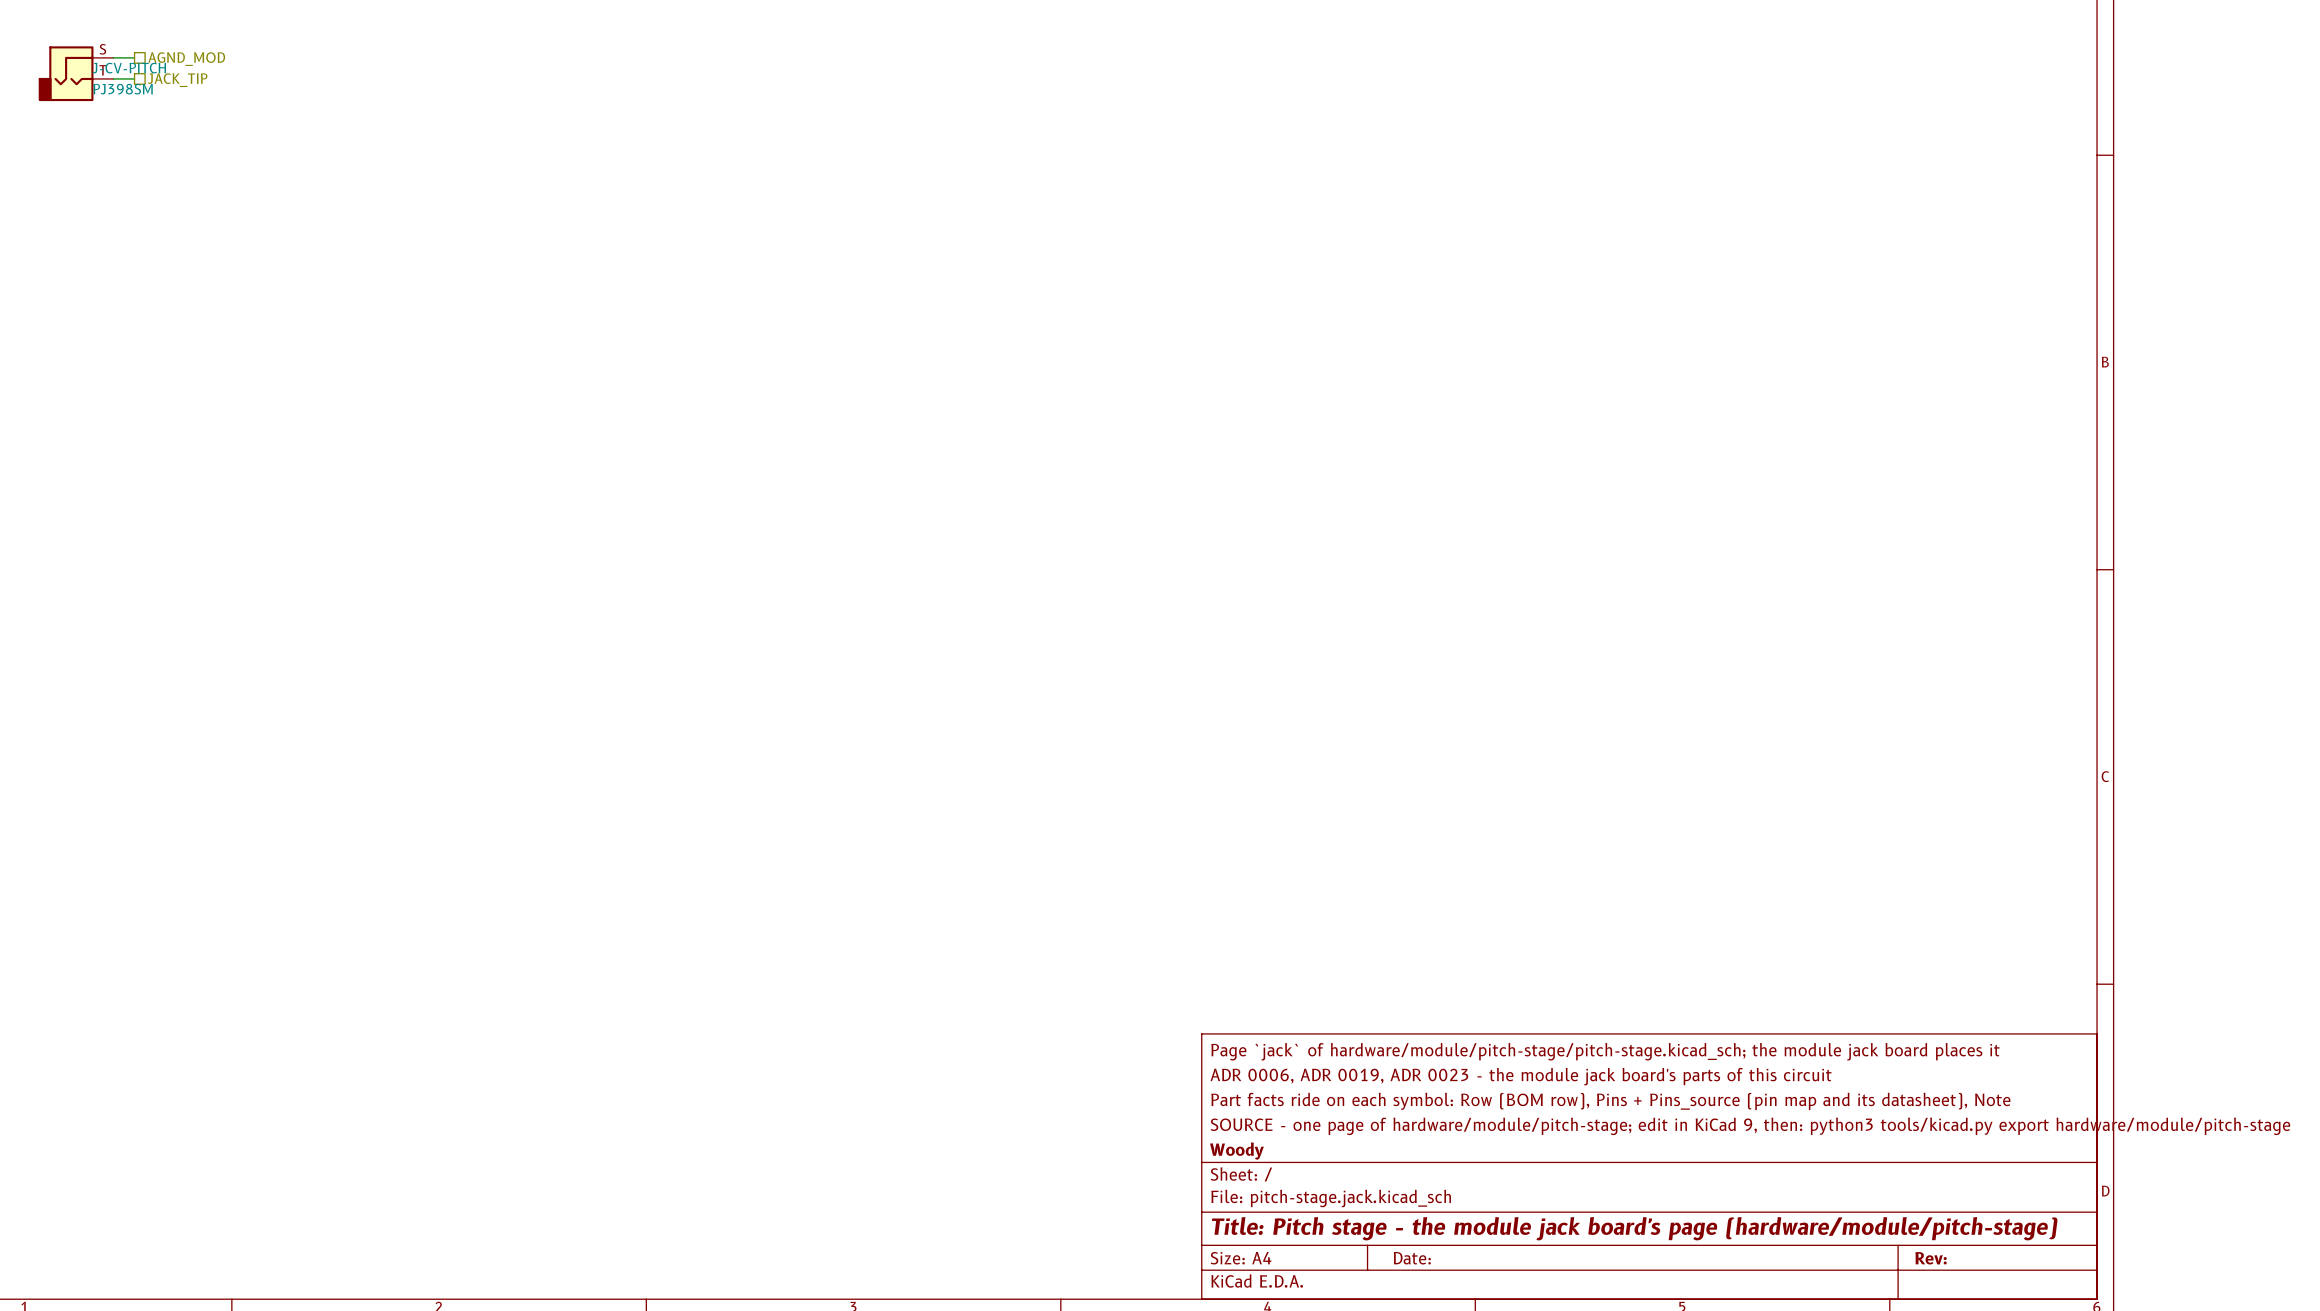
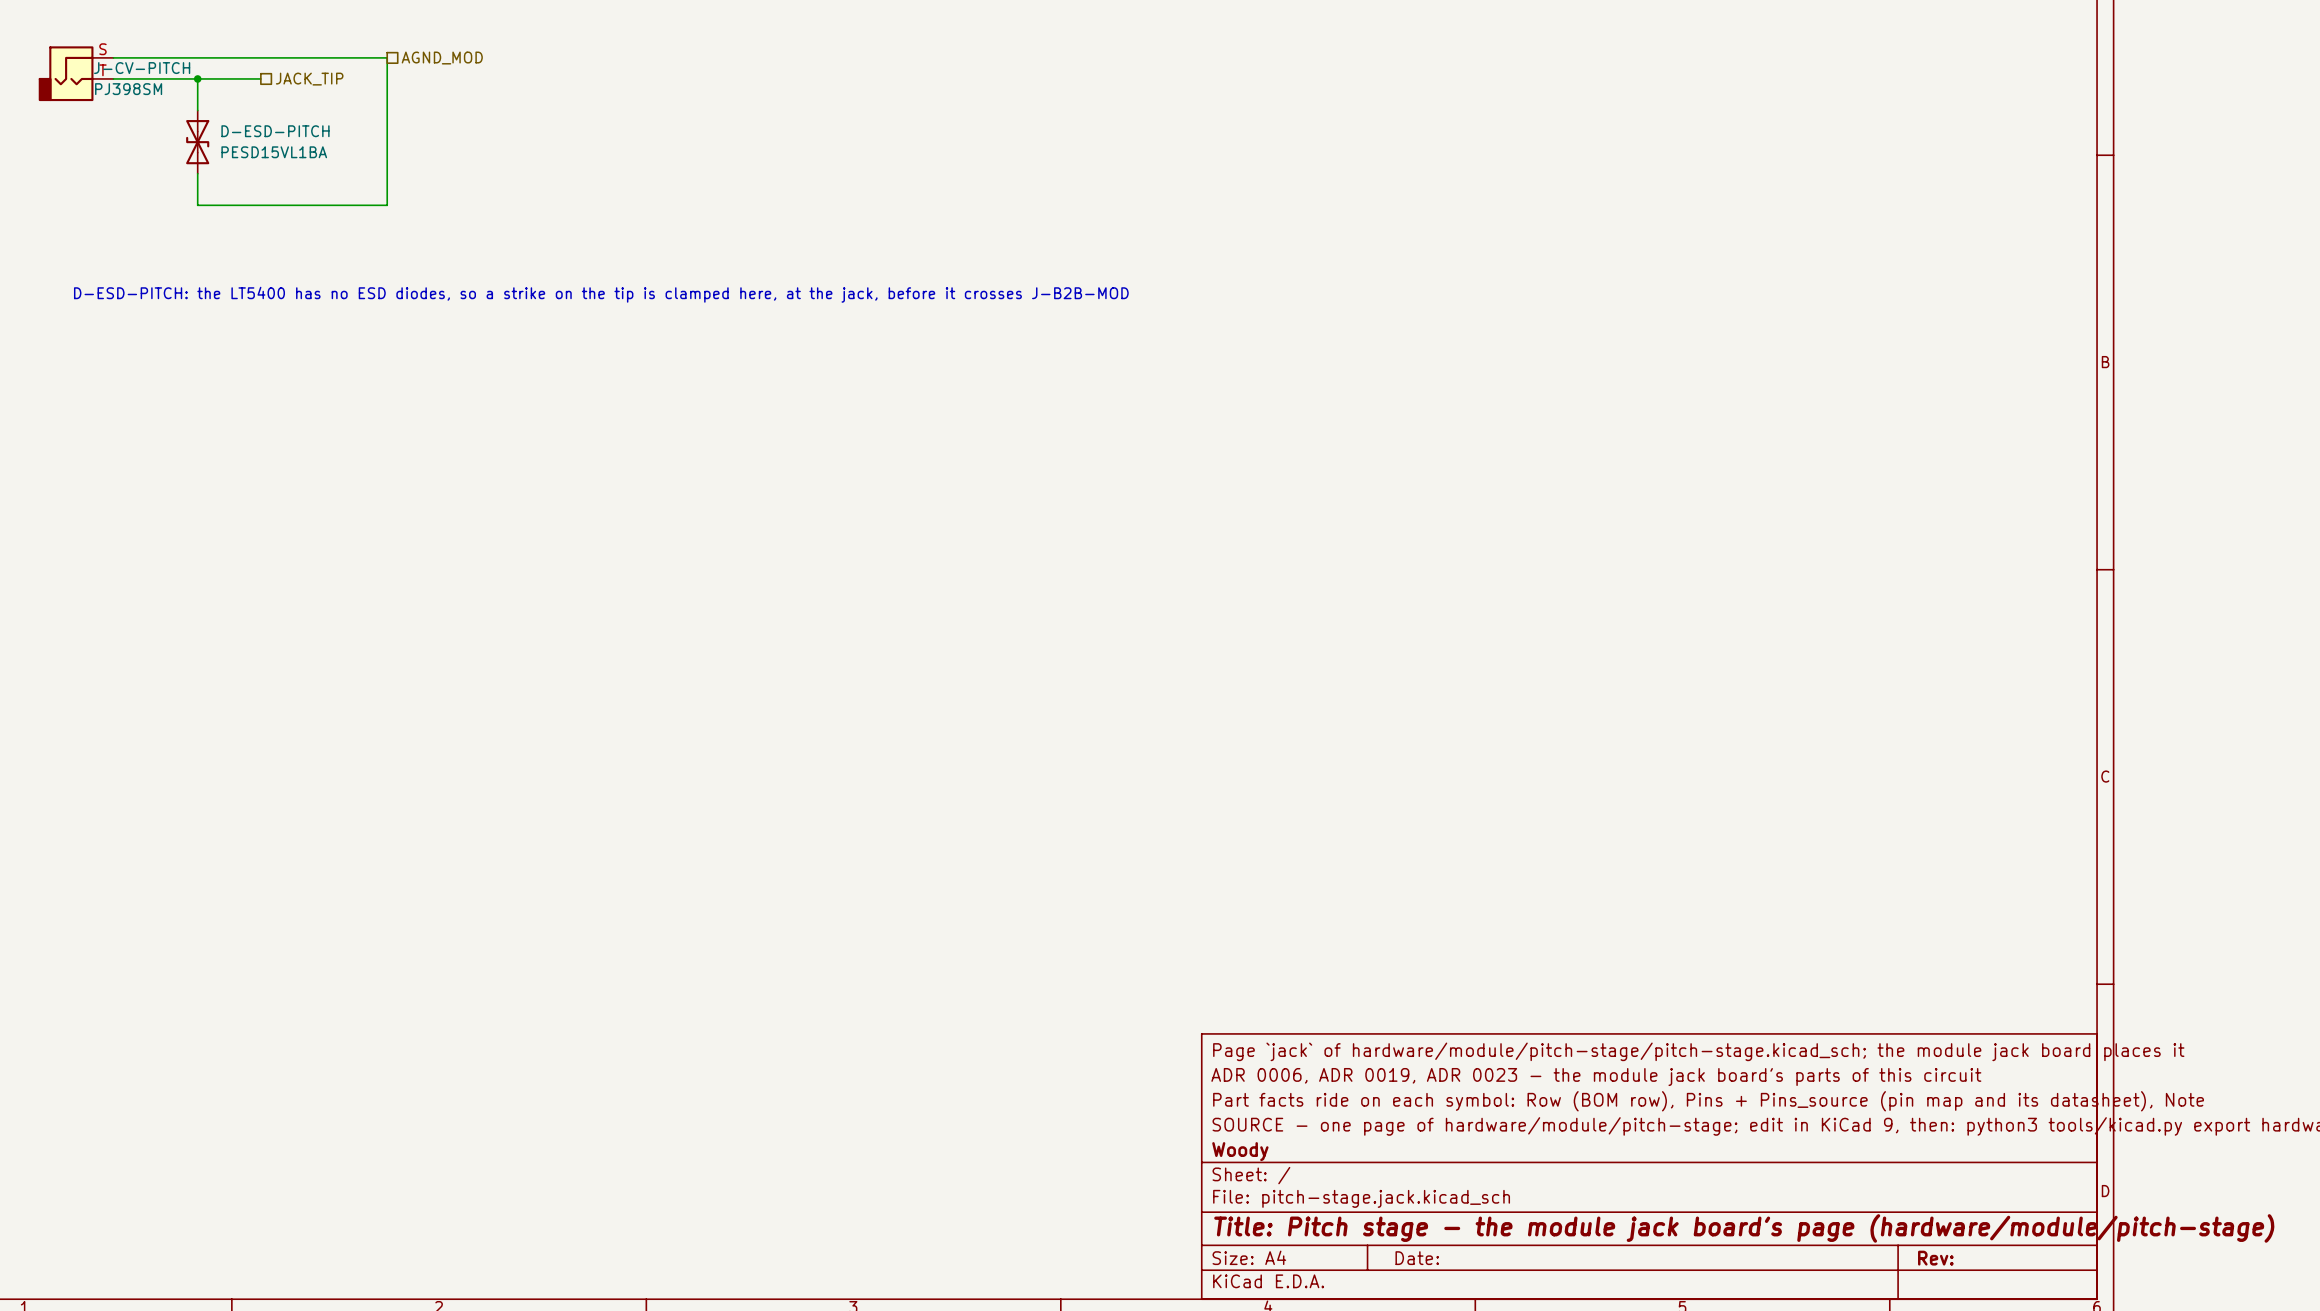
wire: none -> (134, 57) (387, 57) (387, 205) (197, 205) (197, 173)
hierarchical label: AGND_MOD (186, 59) -> none
hierarchical label: none -> AGND_MOD (442, 58)
wire: none -> (134, 78) (260, 78)
wire: none -> (197, 78) (197, 110)
junction: none -> (197, 78)
hierarchical label position: JACK_TIP (177, 80) -> JACK_TIP (309, 79)
D-ESD-PITCH: none -> PESD15VL1BA (197, 142)
text: none -> D-ESD-PITCH: the LT5400 has no ESD diodes, so a strike on the tip is clamped here, at the jack, before it crosses J-B2B-MOD (601, 294)

